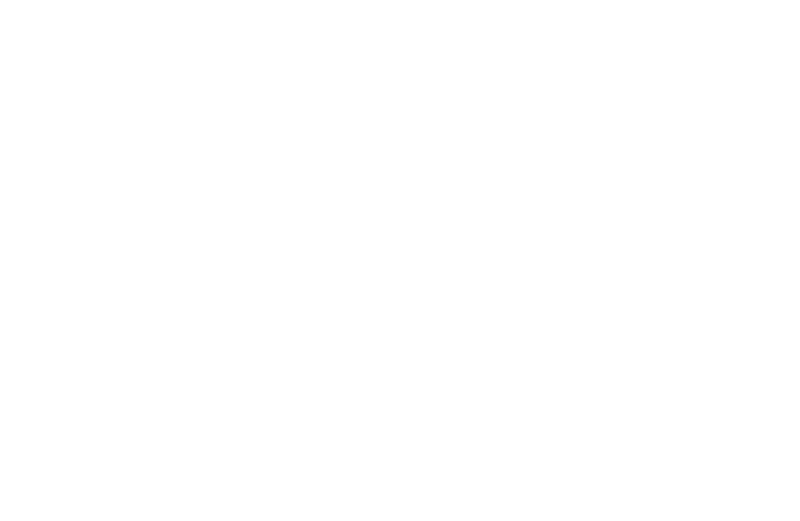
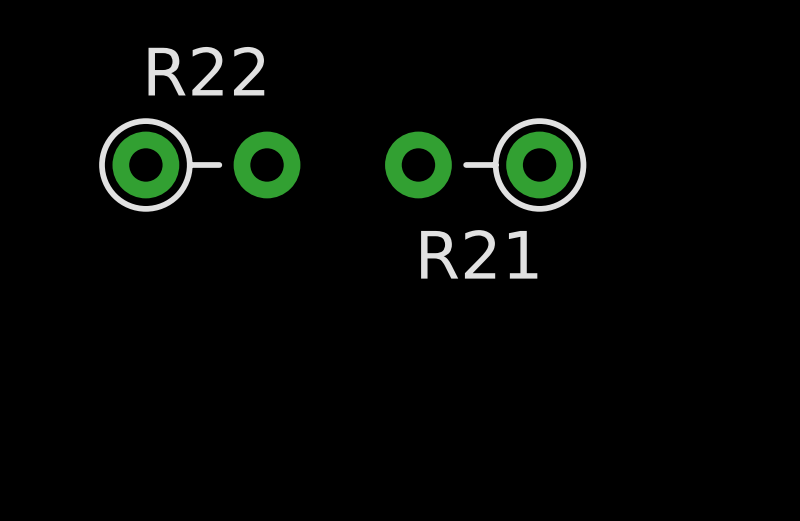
R22: none -> (199, 164)
R21: none -> (485, 164)

